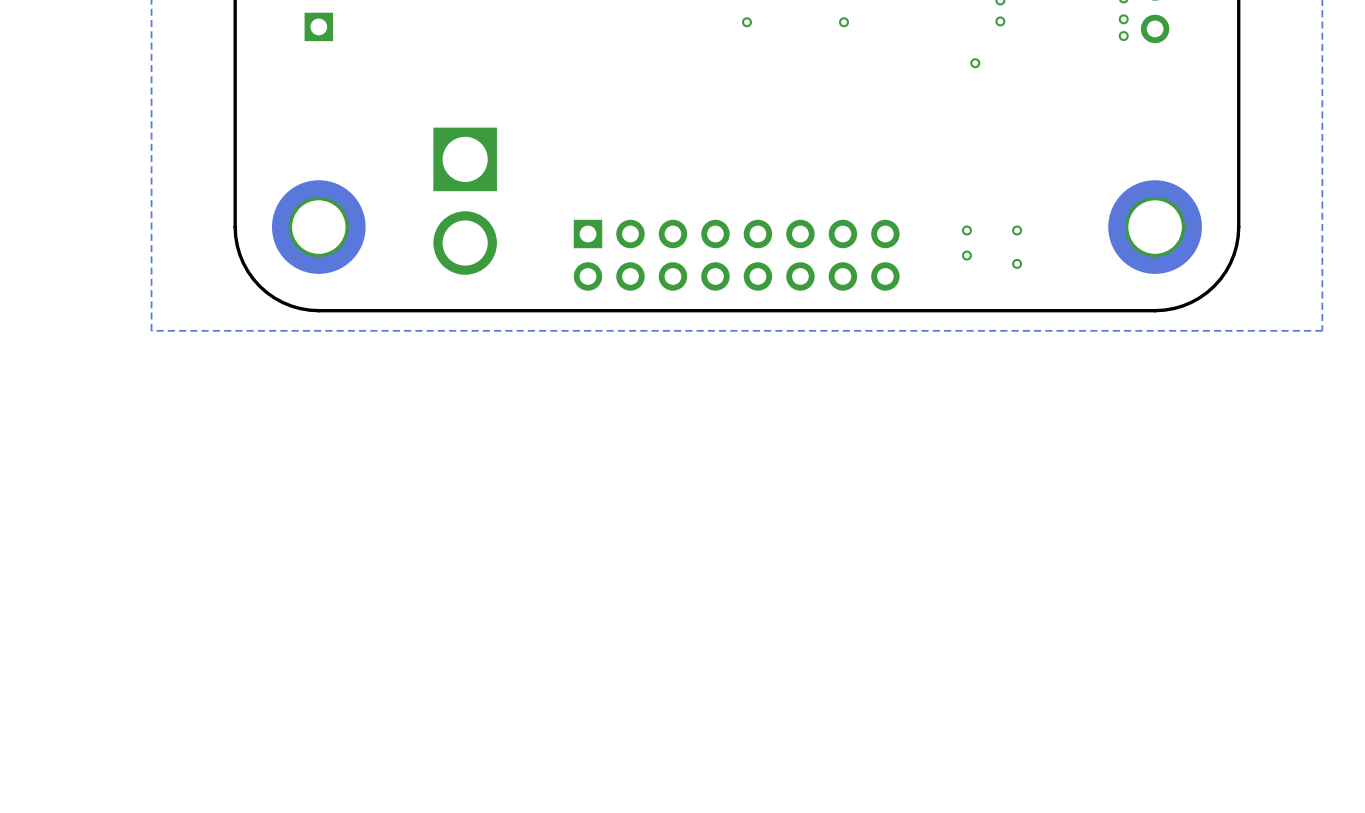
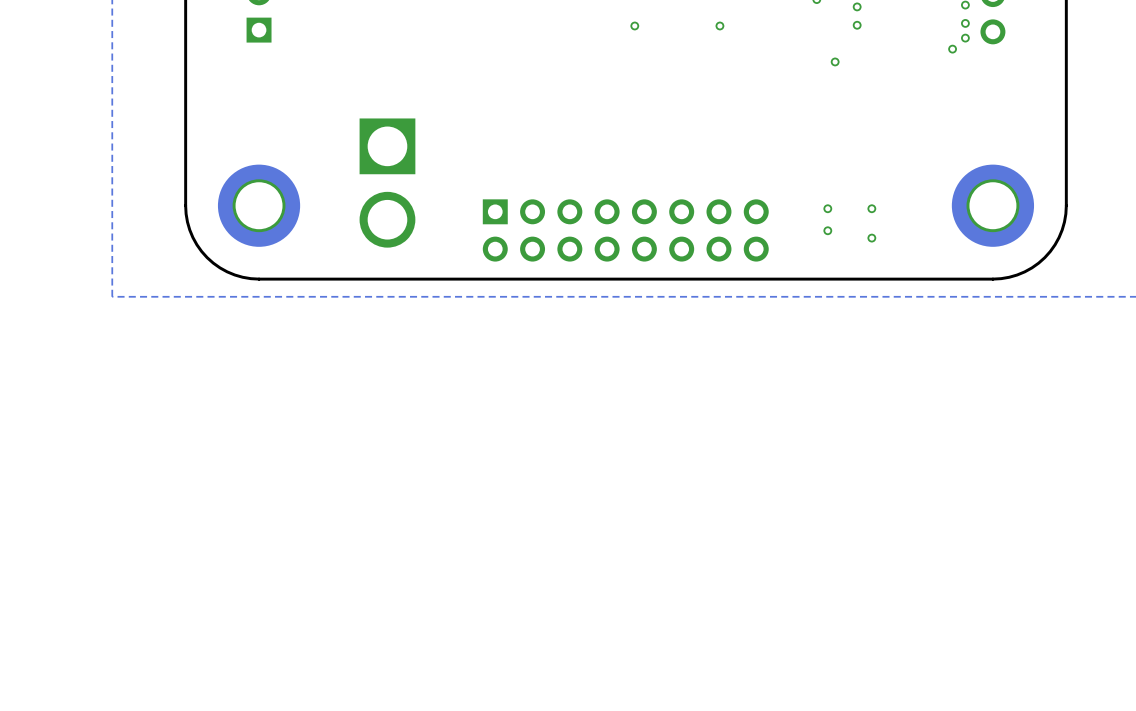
via: none -> (952, 49)

